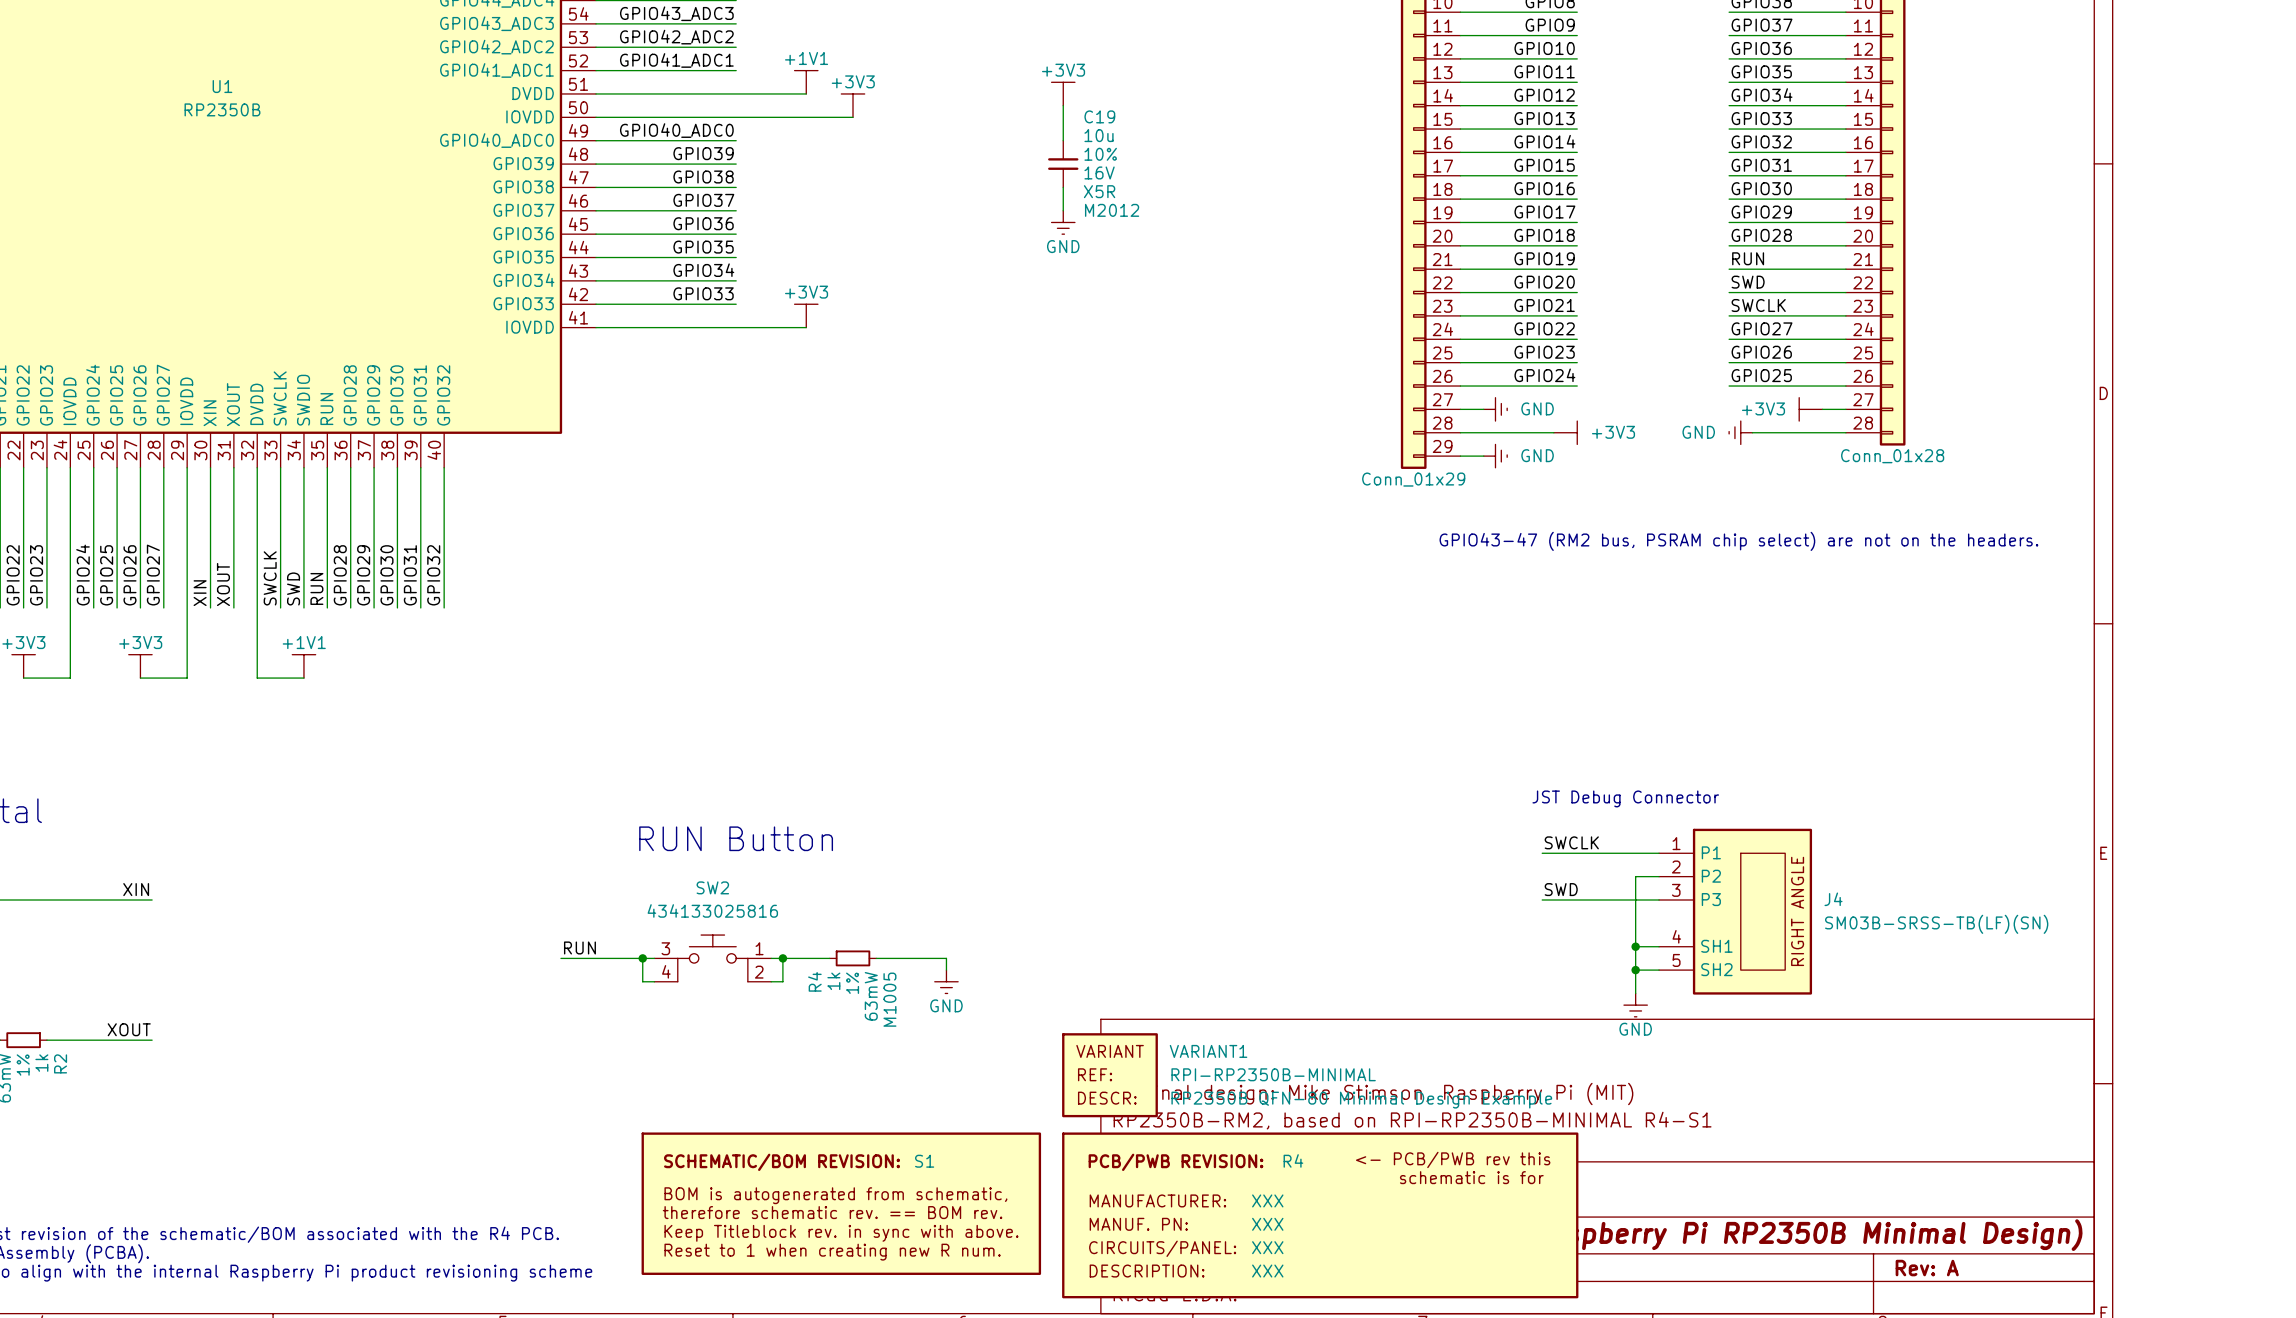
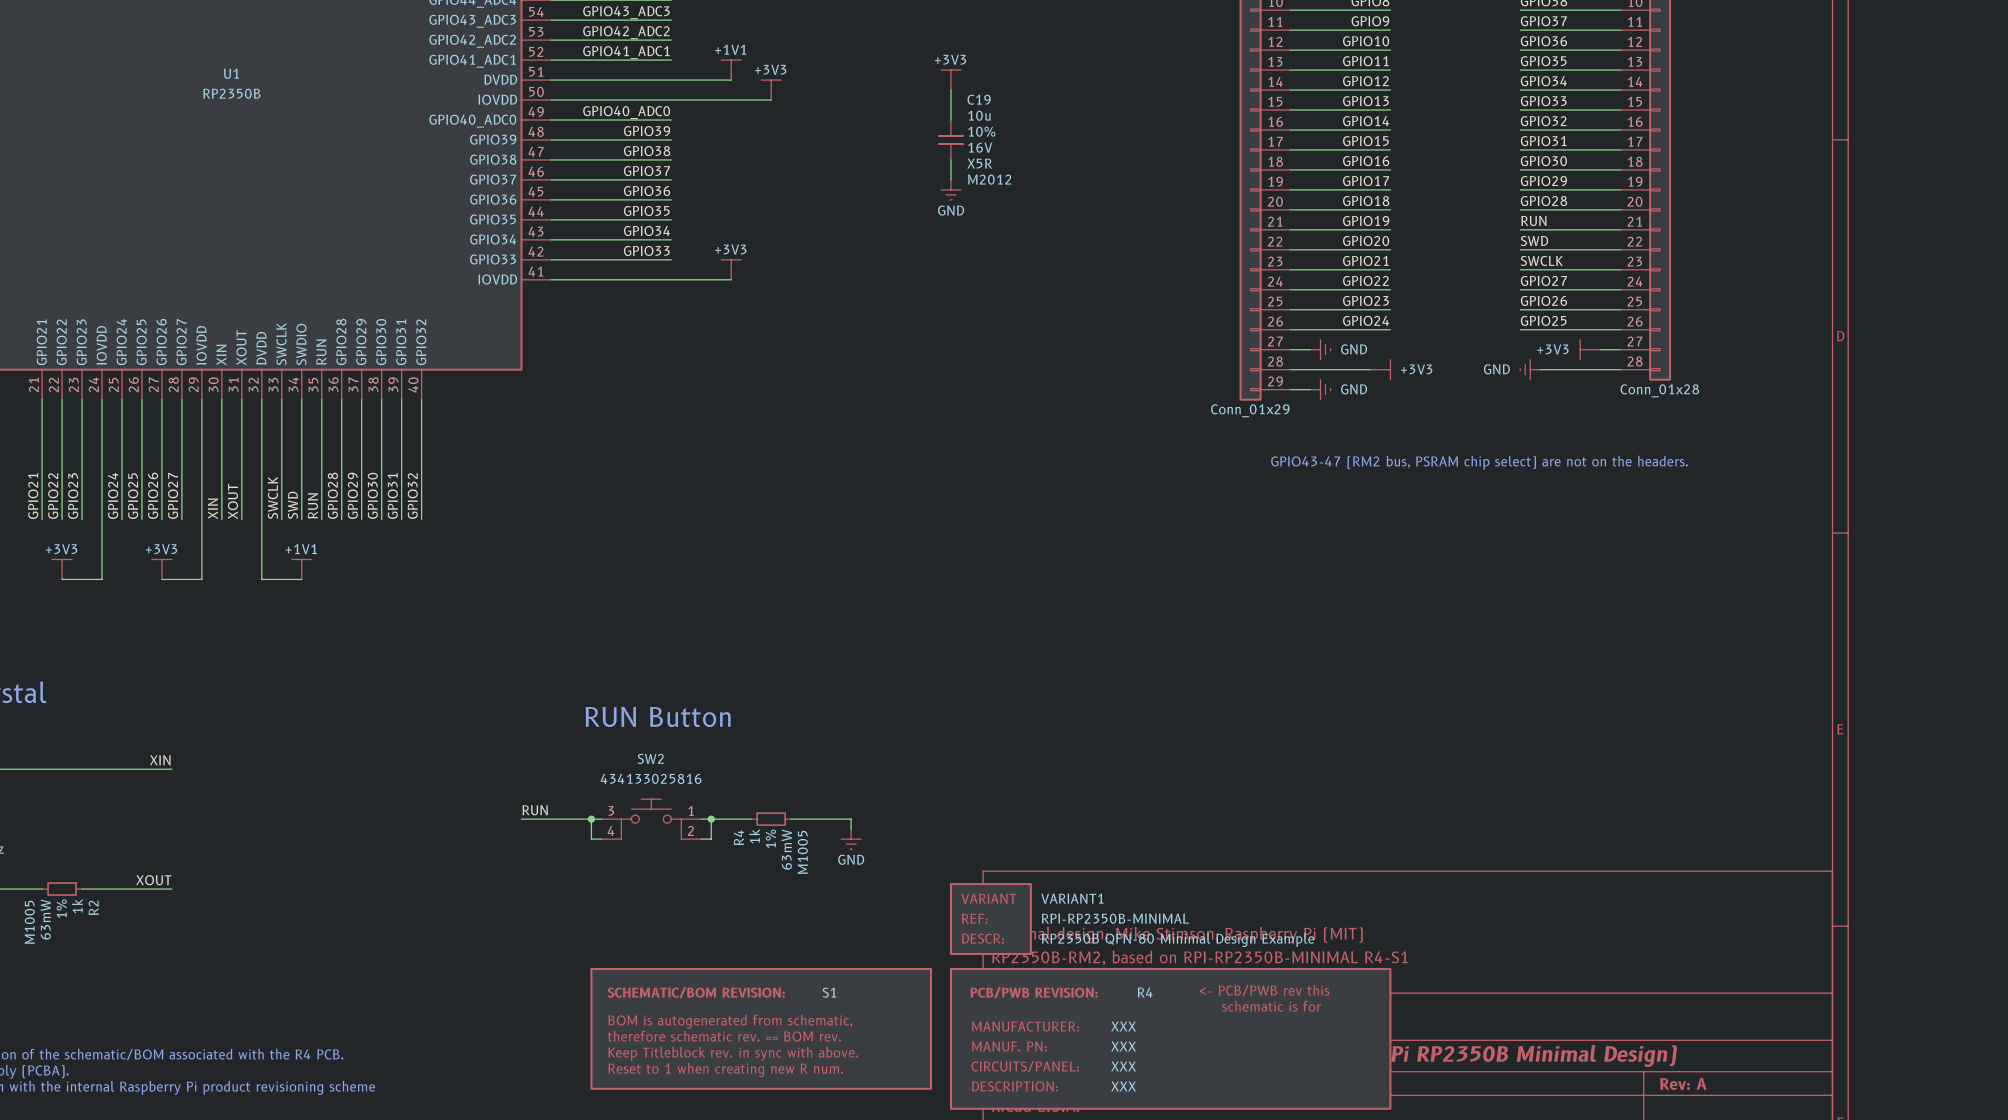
text: JST Debug Connector (1625, 798) -> none
label: SWCLK (1571, 842) -> none
wire: (1542, 853) (1659, 853) -> none
wire: (1659, 876) (1635, 876) (1635, 993) -> none
label: SWD (1561, 889) -> none
wire: (1542, 900) (1659, 900) -> none
J4: SM03B-SRSS-TB(LF)(SN) (1735, 911) -> none
wire: (1635, 946) (1659, 946) -> none
junction: (1635, 946) -> none
wire: (1635, 970) (1659, 970) -> none
junction: (1635, 970) -> none
power symbol: GND (1635, 1005) -> none

